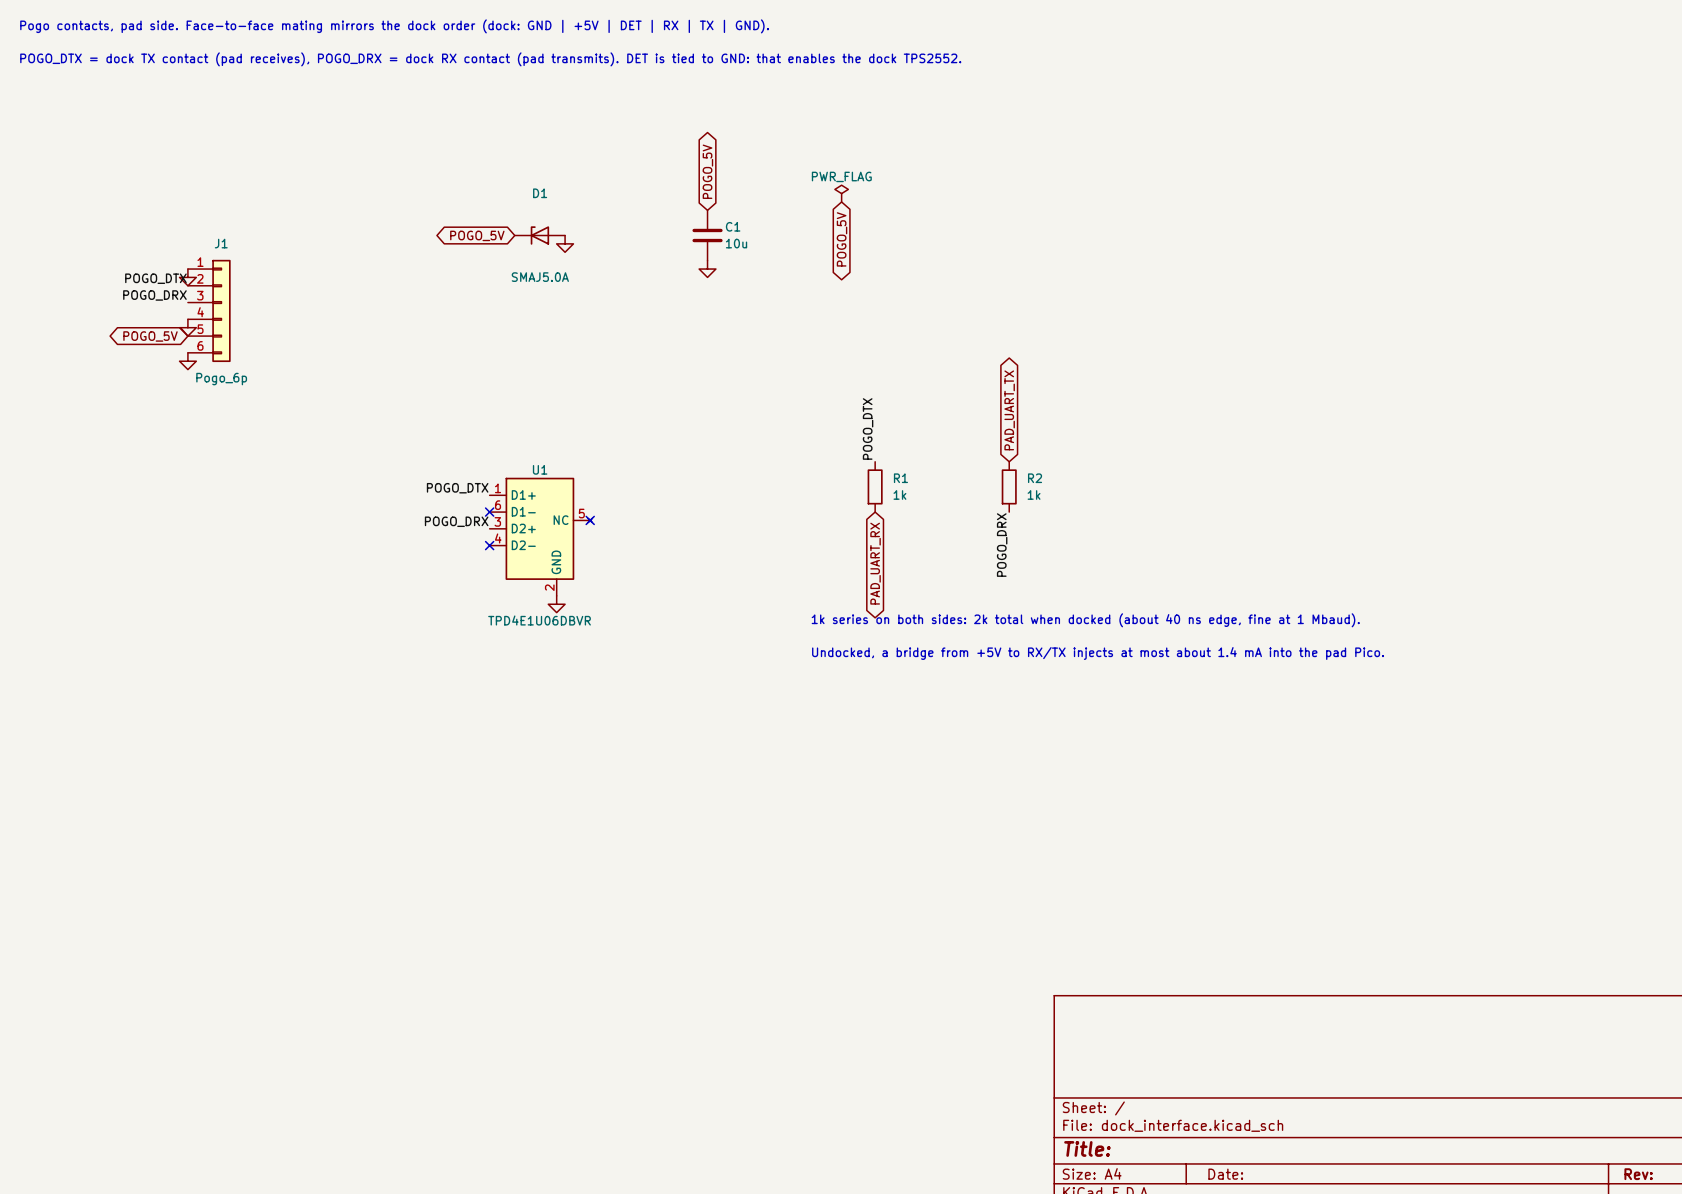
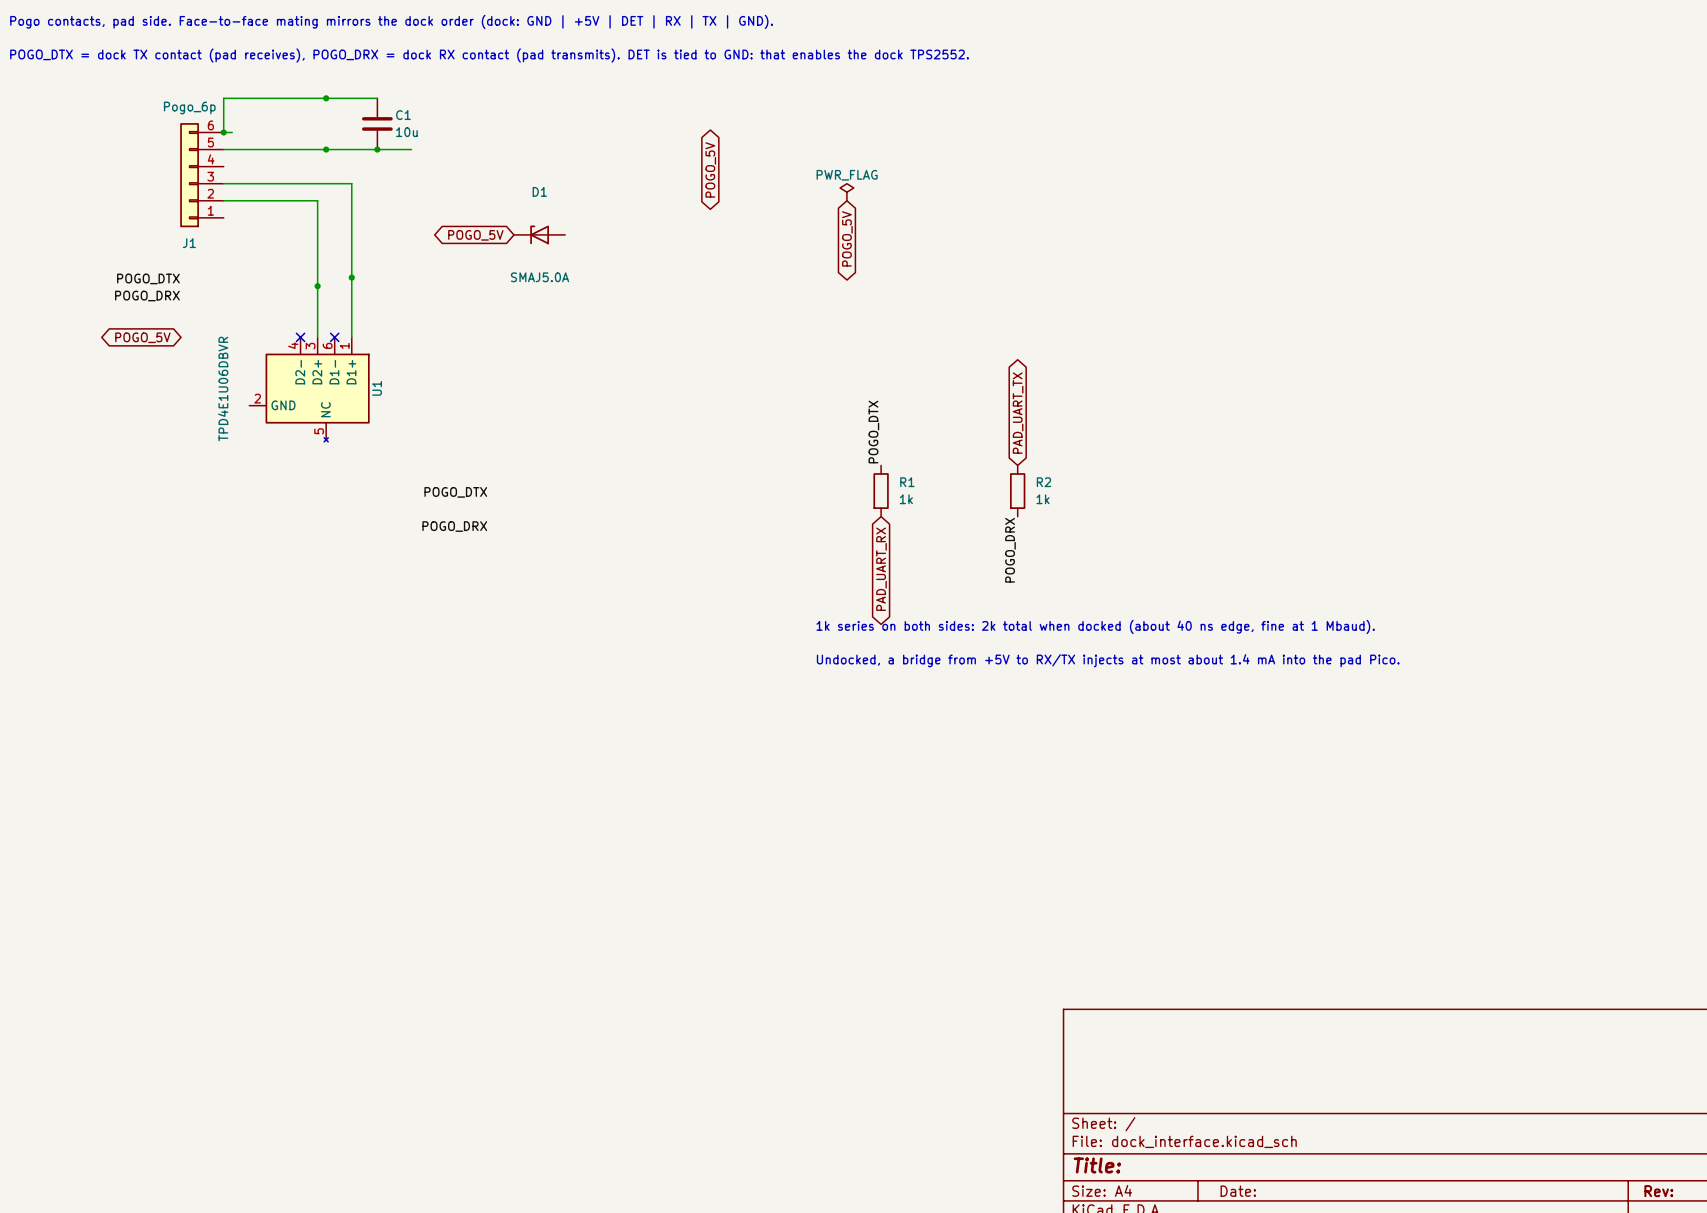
junction: none -> (326, 98)
wire: none -> (377, 98) (223, 98) (223, 132) (232, 132)
junction: none -> (223, 132)
wire: none -> (223, 149) (411, 149)
junction: none -> (326, 149)
junction: none -> (377, 149)
wire: none -> (223, 183) (351, 183) (351, 337)
wire: none -> (223, 200) (317, 200) (317, 337)
C1 position: (707, 235) -> (377, 123)
power symbol: (565, 243) -> none
power symbol: (707, 269) -> none
power symbol: (187, 277) -> none
junction: none -> (351, 277)
junction: none -> (317, 286)
J1 position: (209, 310) -> (201, 175)
J1 rotation: 0° (221, 310) -> 180° (189, 175)
power symbol: (187, 327) -> none
no-connect mark: none -> (300, 337)
no-connect mark: none -> (334, 337)
power symbol: (187, 361) -> none
no-connect mark: (489, 512) -> none
no-connect mark: (590, 520) -> none
U1 rotation: 0° (548, 528) -> 90° clockwise (317, 397)
U1 position: (540, 536) -> (309, 389)
no-connect mark: (489, 545) -> none
power symbol: (556, 604) -> none

